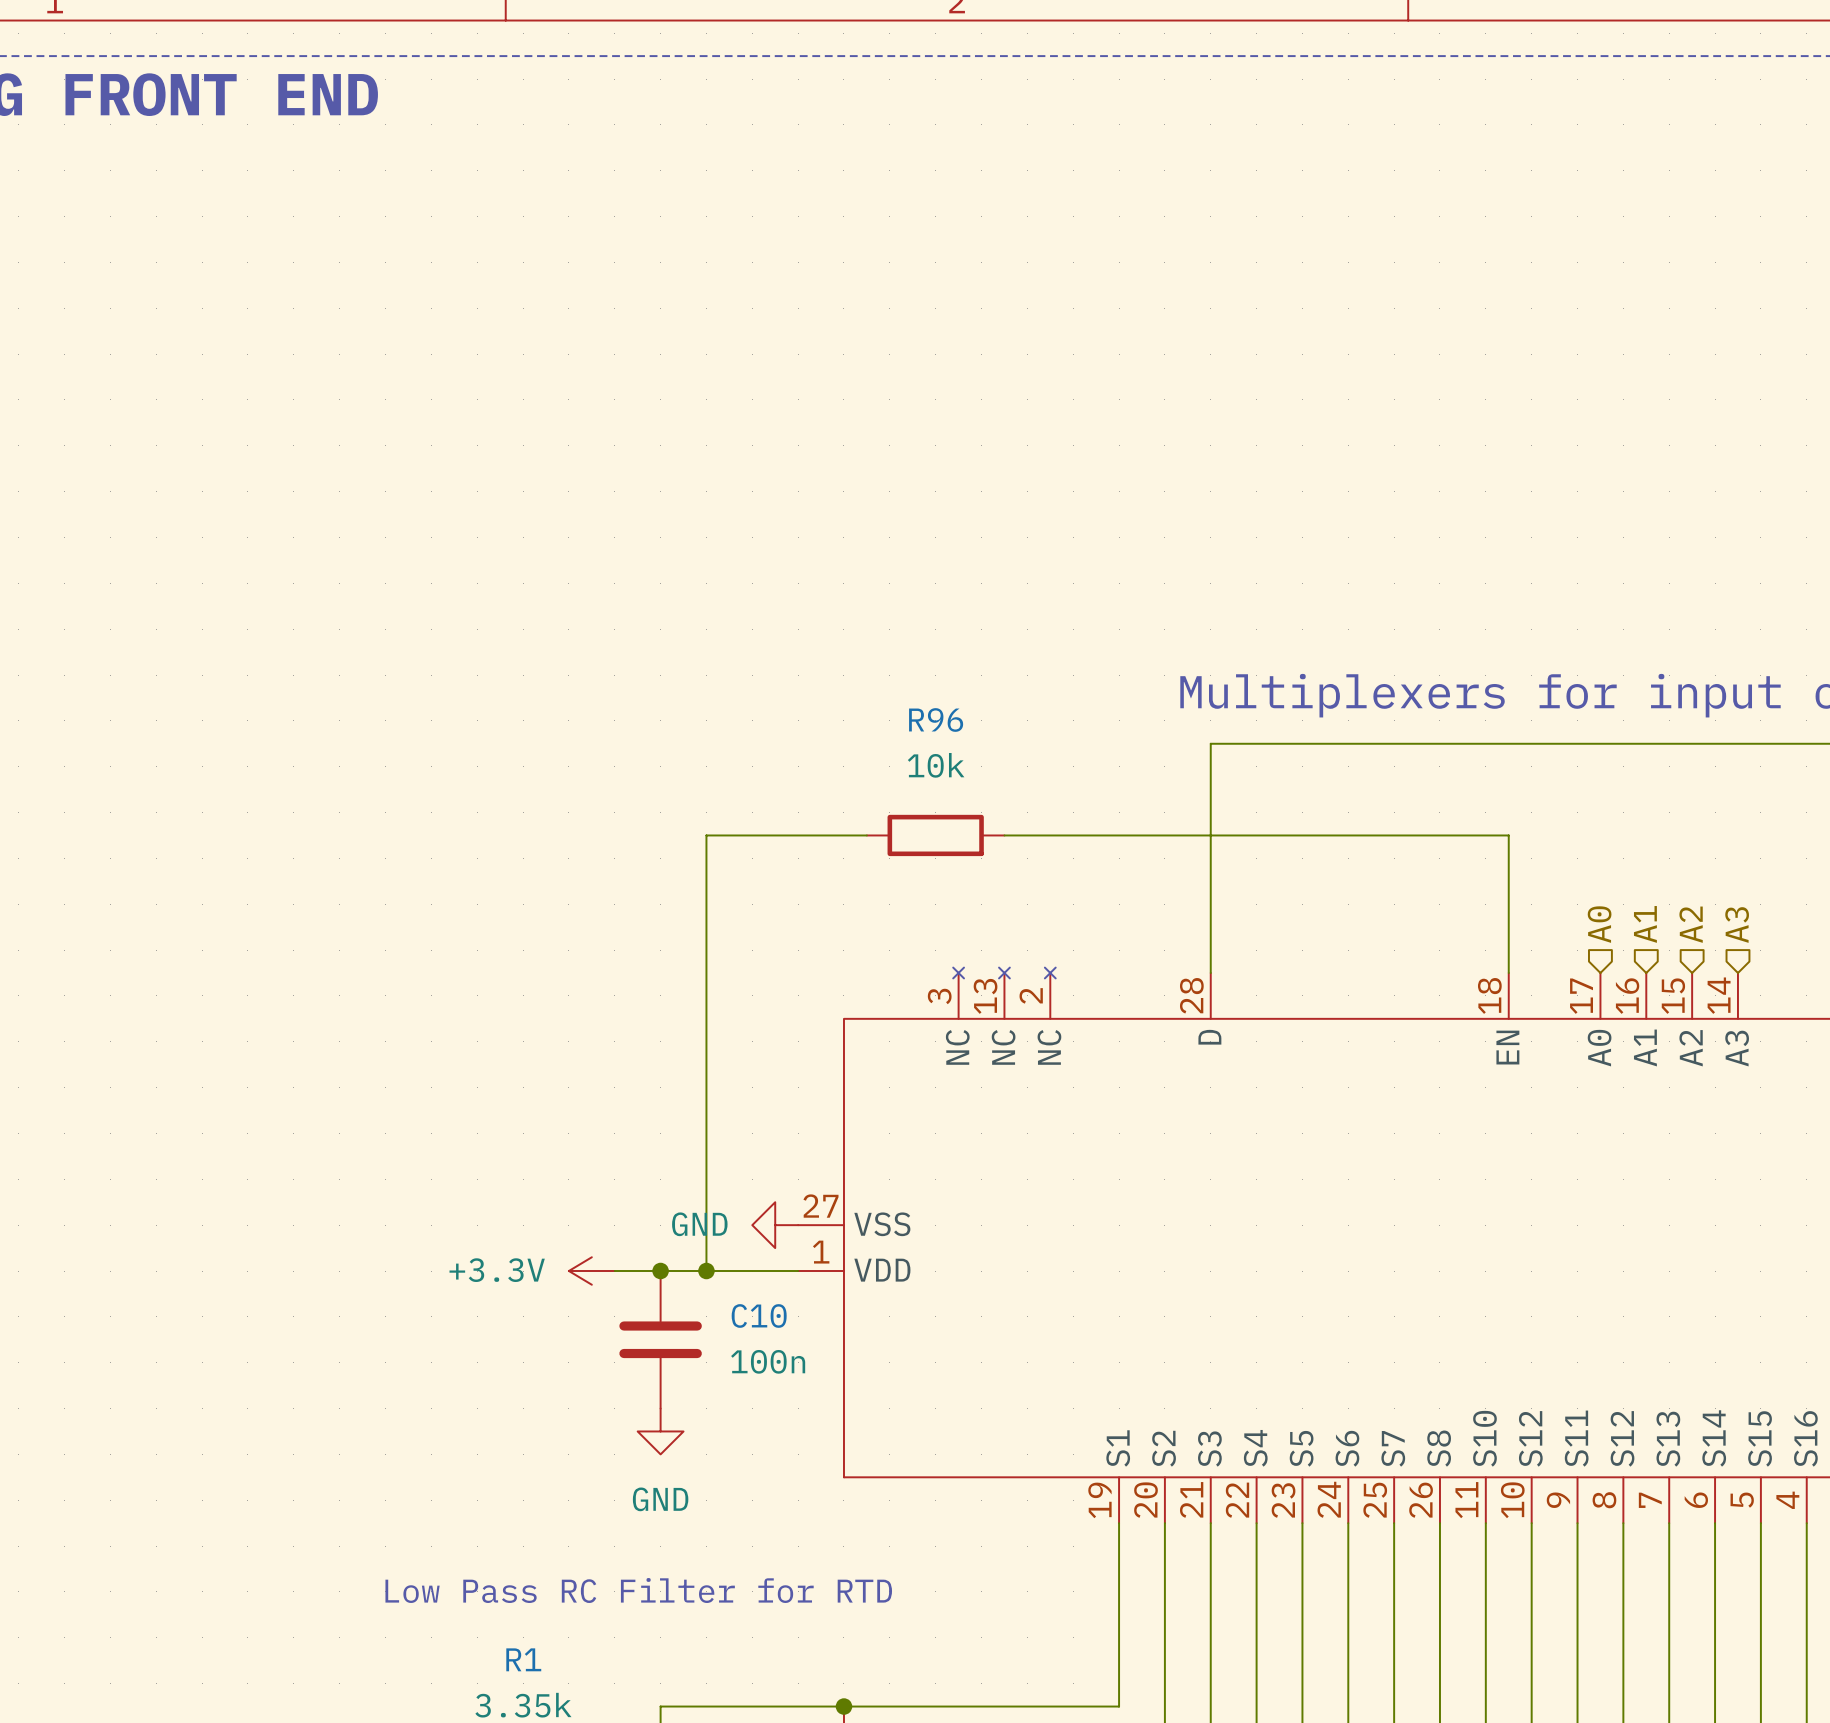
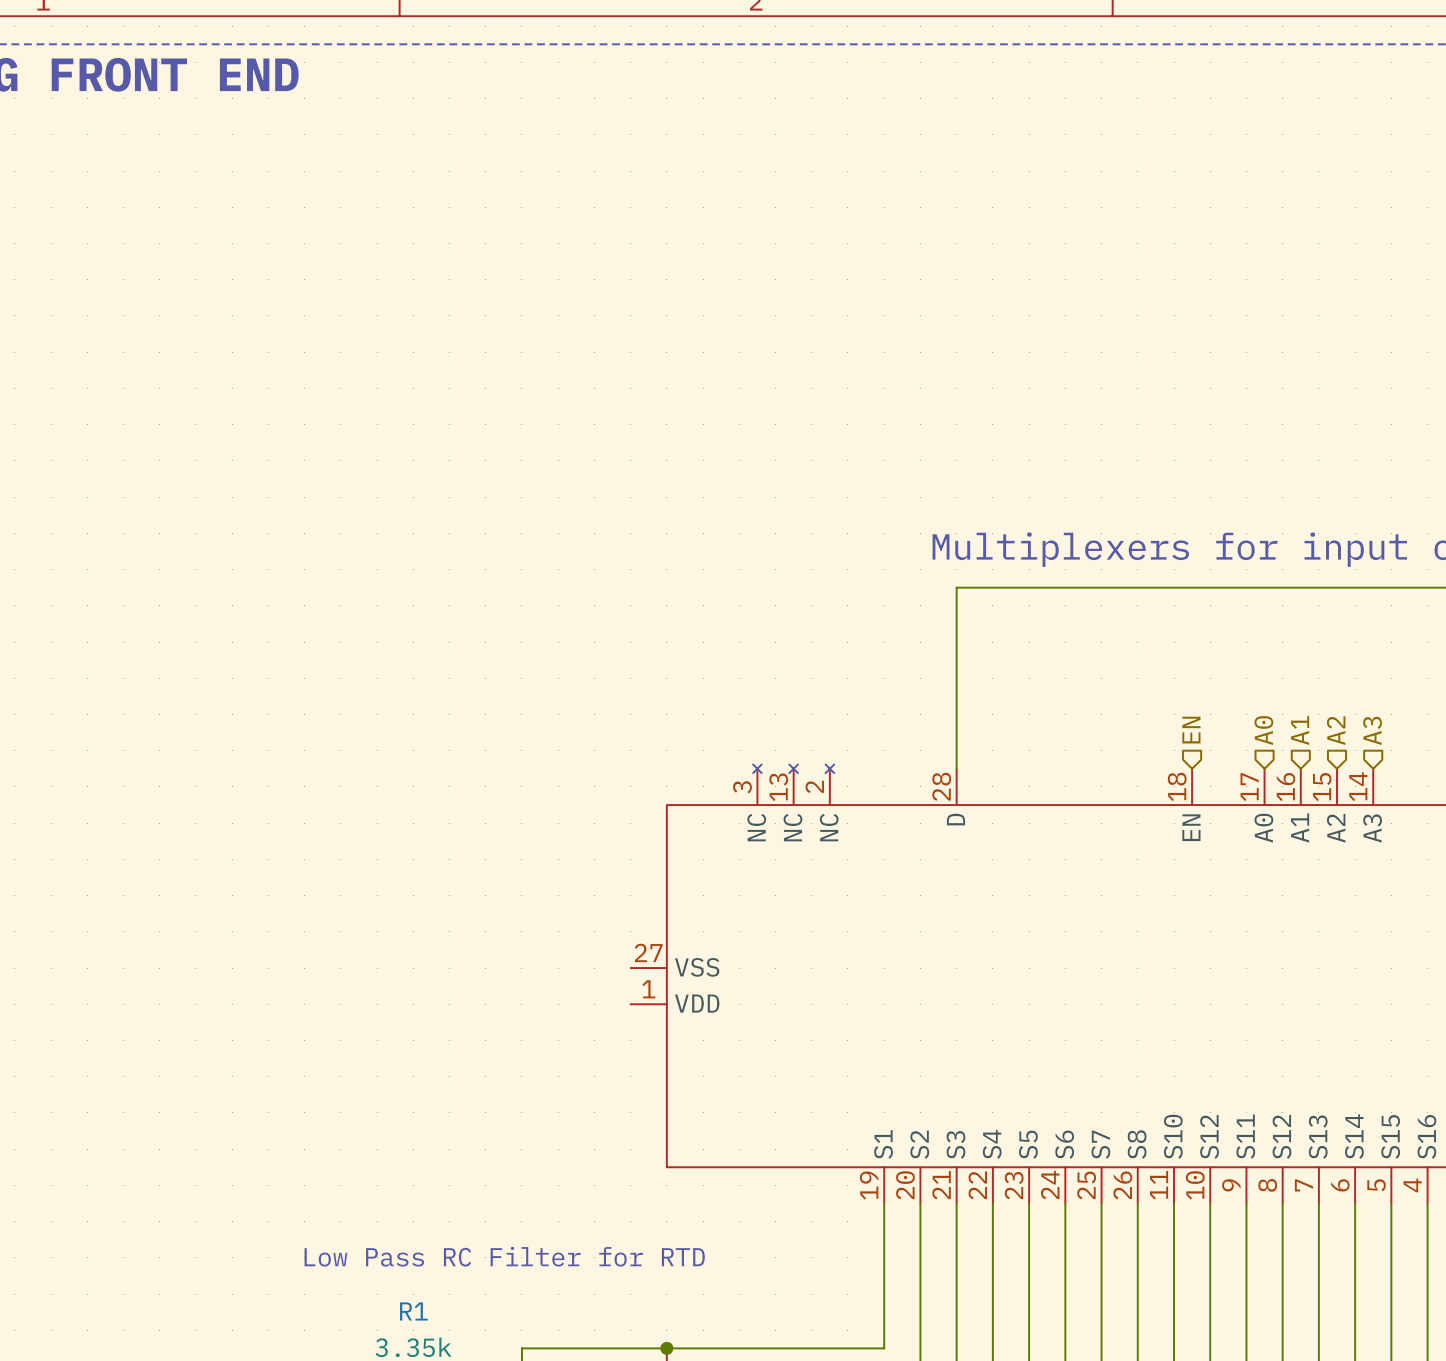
wire: (866, 835) (706, 835) (706, 1271) -> none
R96: 10k (935, 835) -> none
wire: (1004, 835) (1508, 835) (1508, 973) -> none
hierarchical label: none -> EN (1191, 730)
power symbol: GND (775, 1225) -> none
power symbol: +3.3V (591, 1271) -> none
wire: (614, 1271) (798, 1271) -> none
junction: (660, 1271) -> none
junction: (706, 1271) -> none
C10: 100n (660, 1339) -> none
power symbol: GND (660, 1431) -> none

